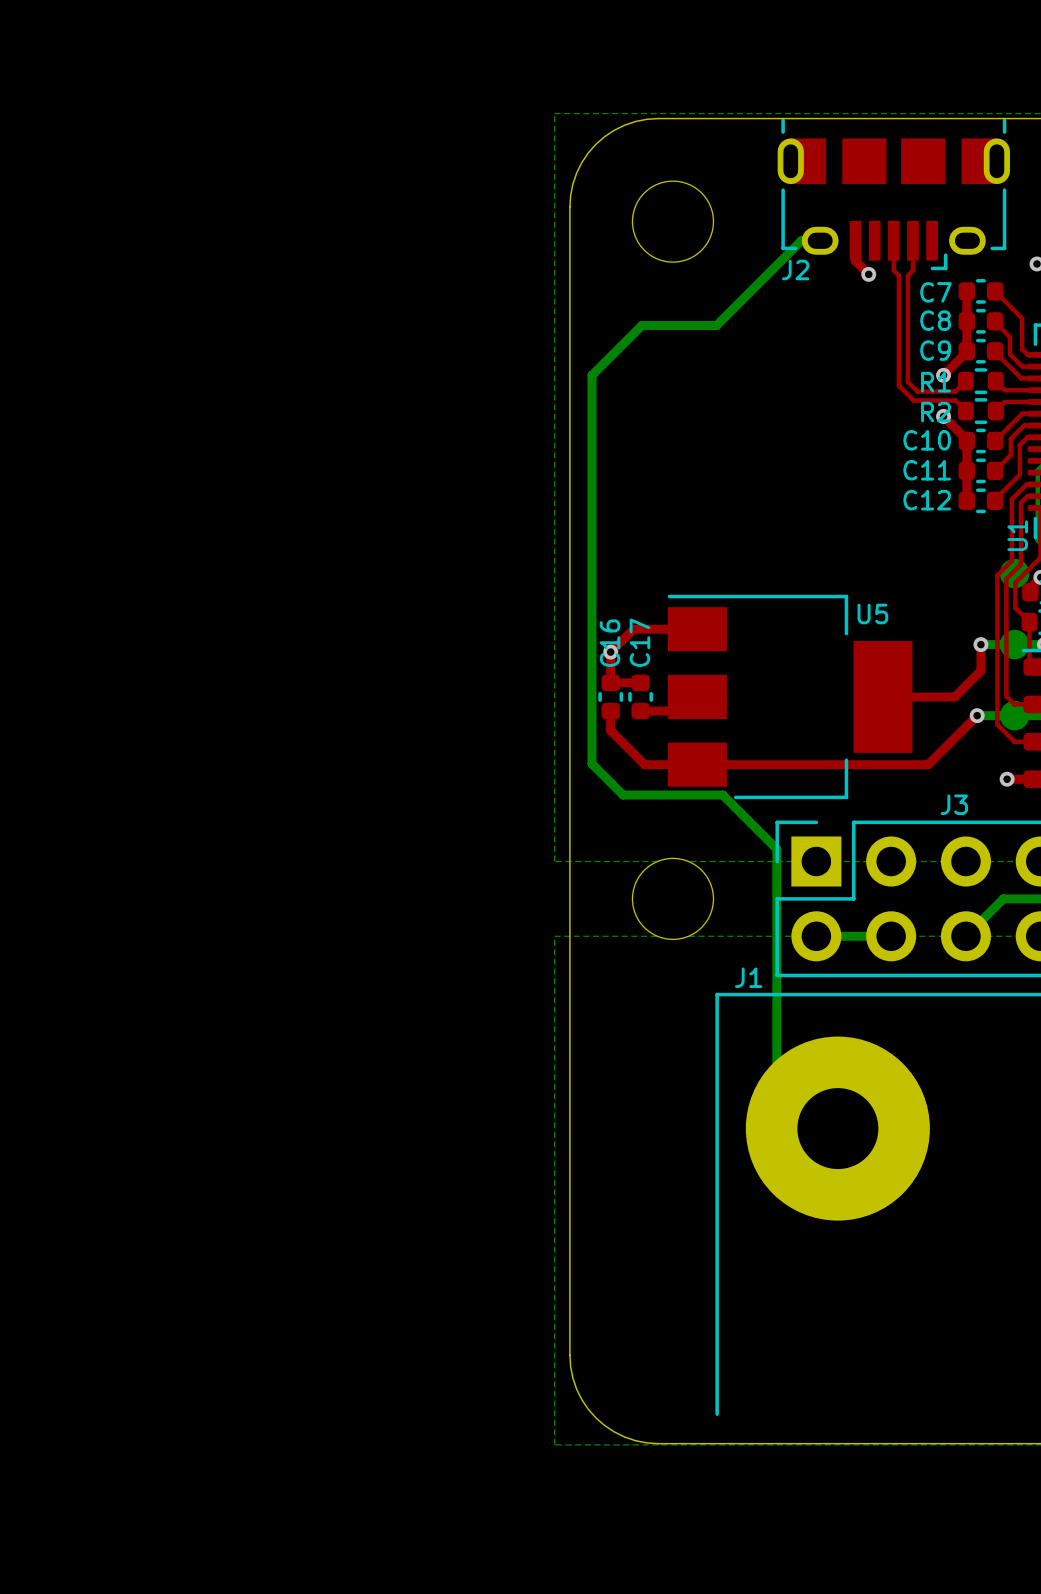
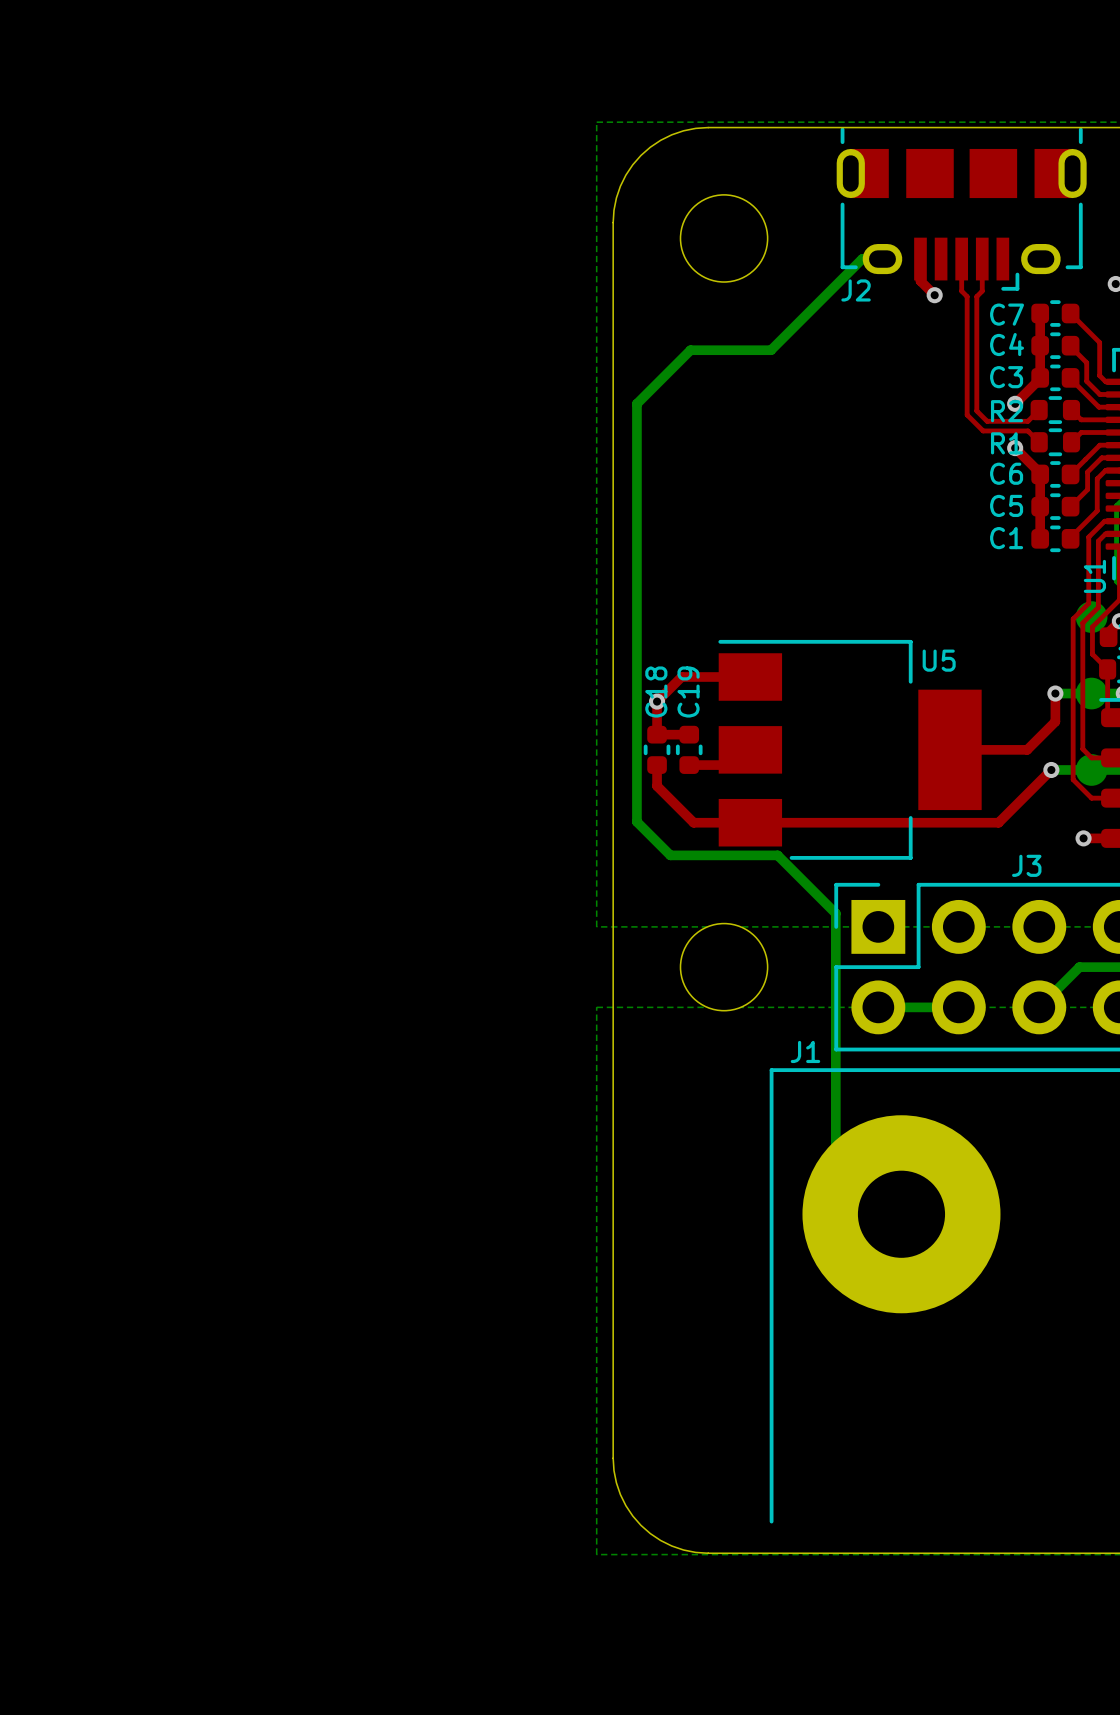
C8 name: C8 (935, 320) -> C4 (1007, 344)
C9 name: C9 (935, 350) -> C3 (1006, 377)
R1 name: R1 (935, 382) -> R2 (1007, 411)
R2 name: R2 (935, 412) -> R1 (1007, 443)
C10 name: C10 (927, 440) -> C6 (1006, 473)
C11 name: C11 (927, 470) -> C5 (1006, 505)
C12 name: C12 (927, 500) -> C1 (1006, 538)
C17 name: C17 (639, 642) -> C19 (688, 692)
C16 name: C16 (610, 643) -> C18 (656, 692)

